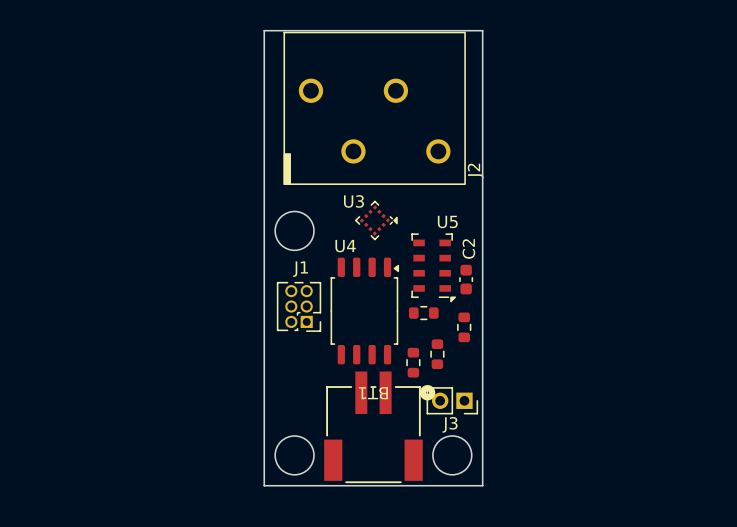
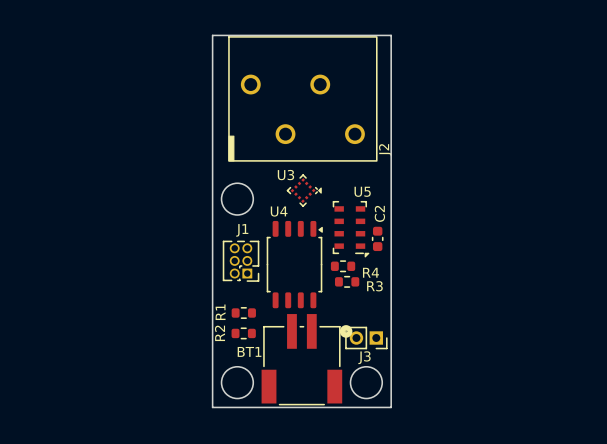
R4 name: none -> R4 (370, 272)
part: (464, 327) -> none
R3: none -> (347, 281)
part: (437, 354) -> none
part: (413, 362) -> none
R1: none -> (243, 313)
BT1 name rotation: 0° (373, 393) -> 180° (249, 351)
BT1 name position: BT1 (373, 393) -> BT1 (249, 351)
R2: none -> (243, 333)

